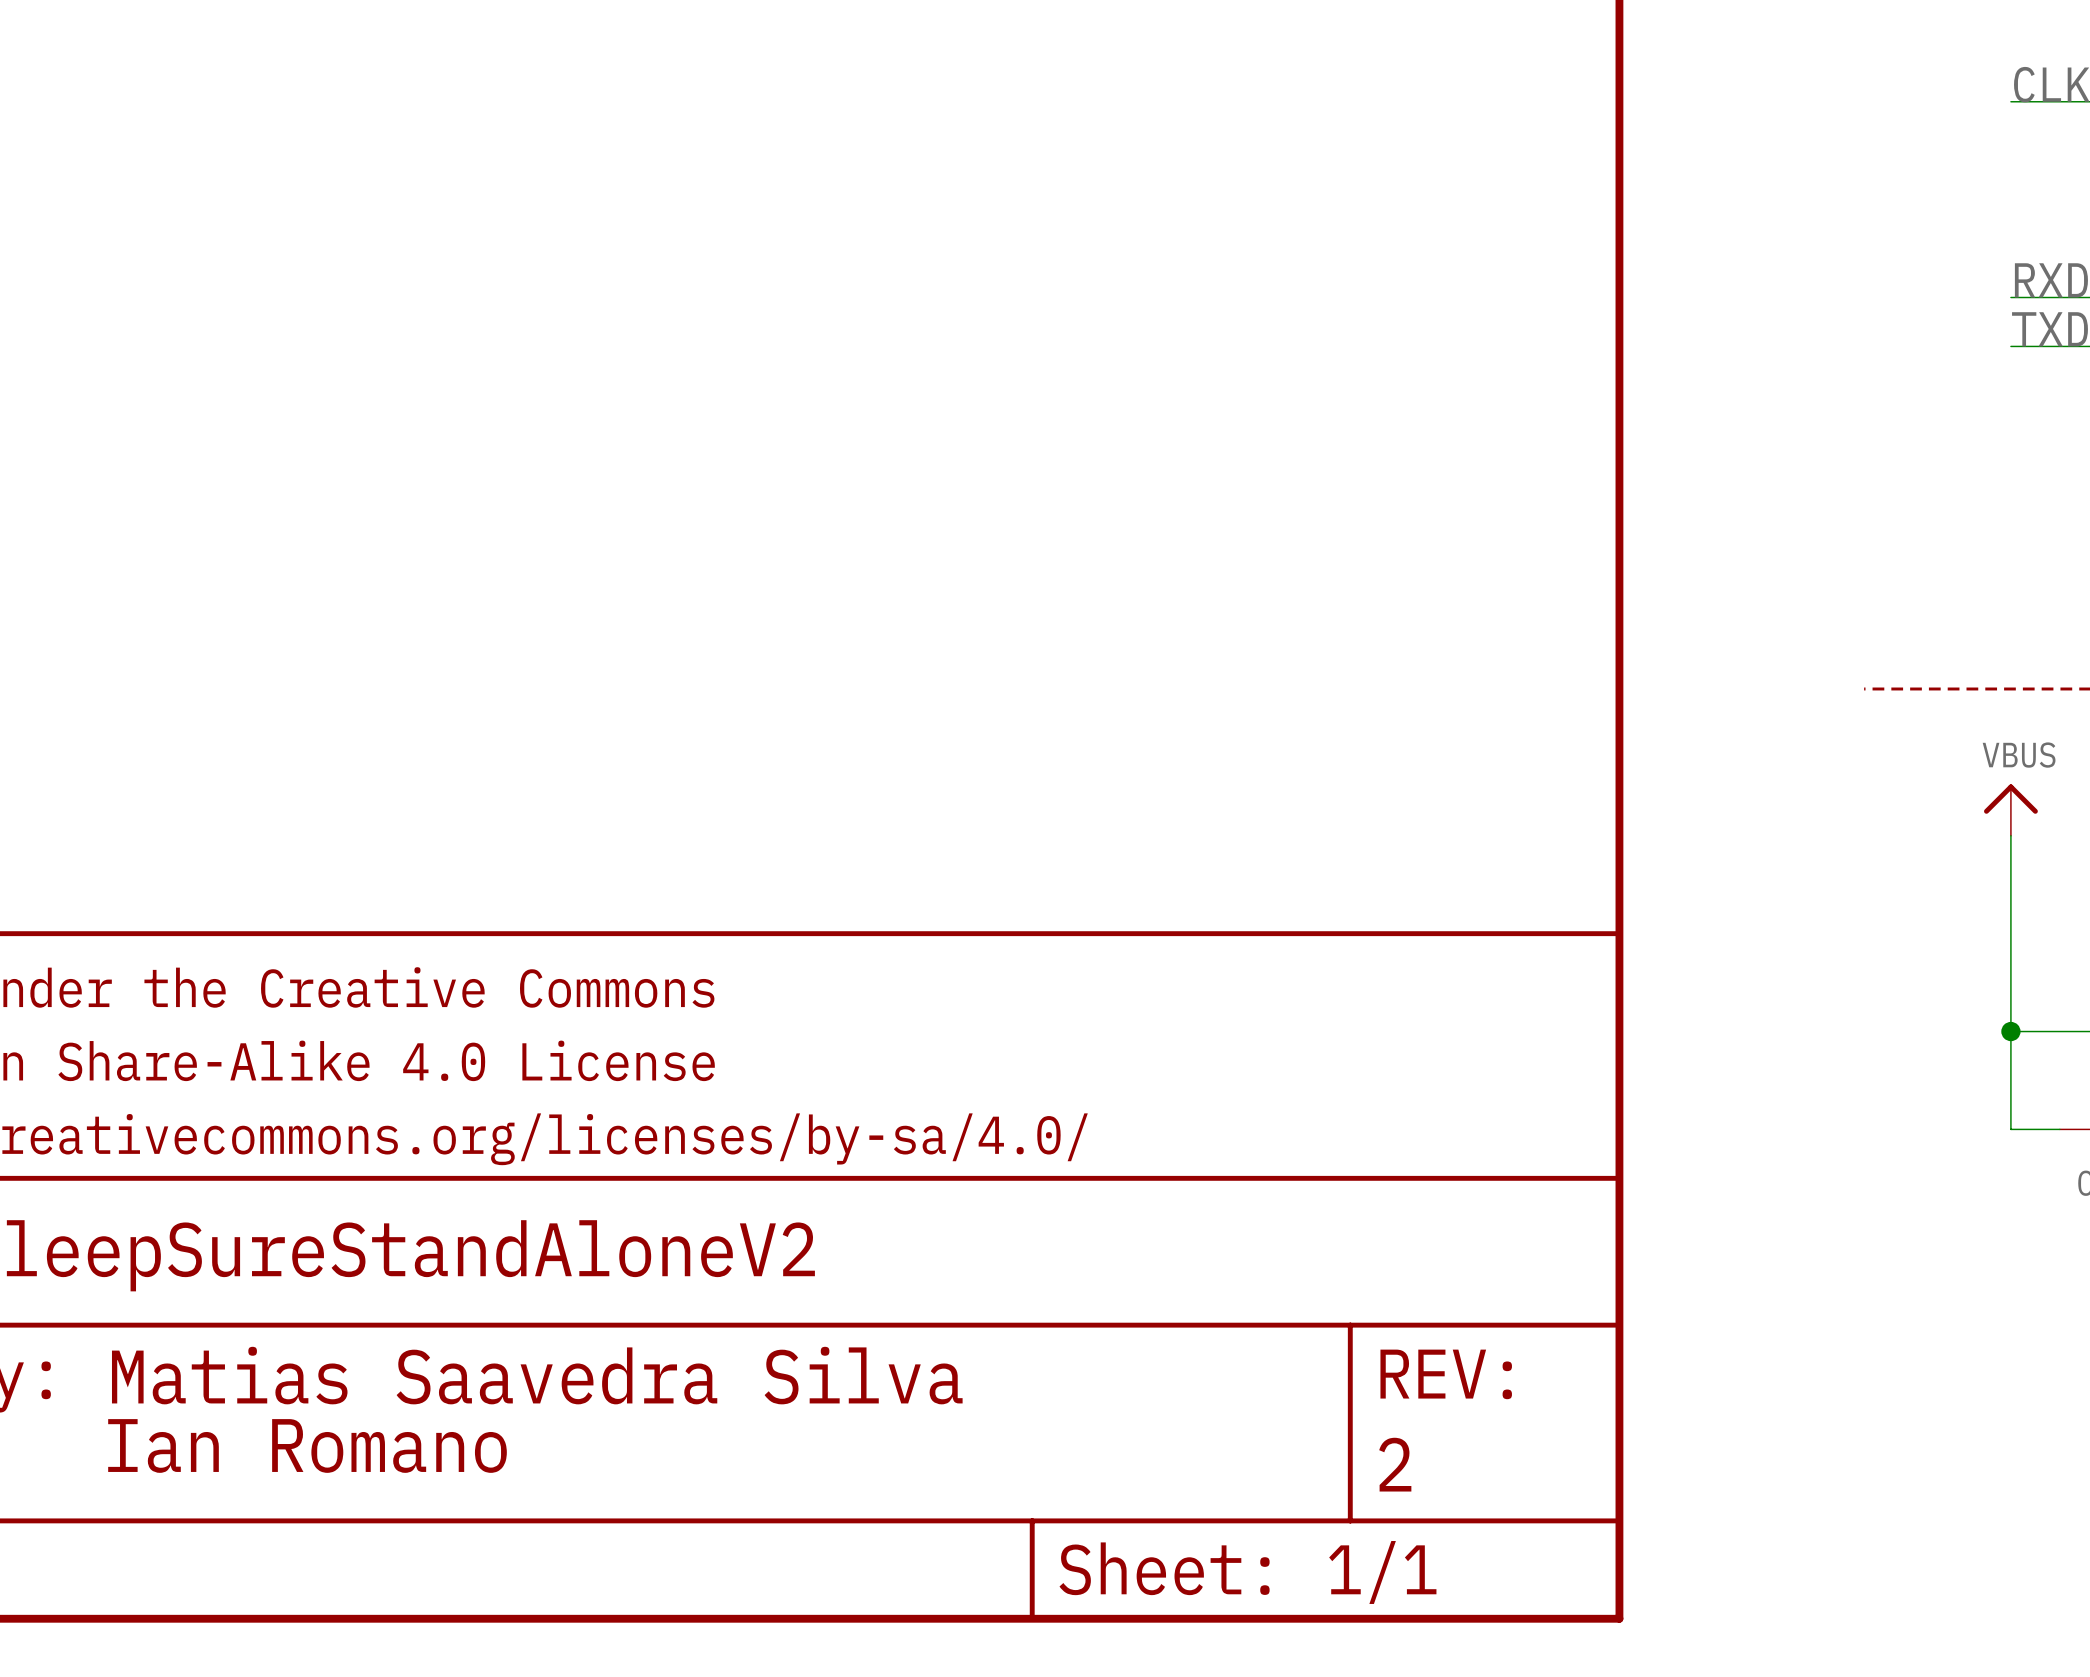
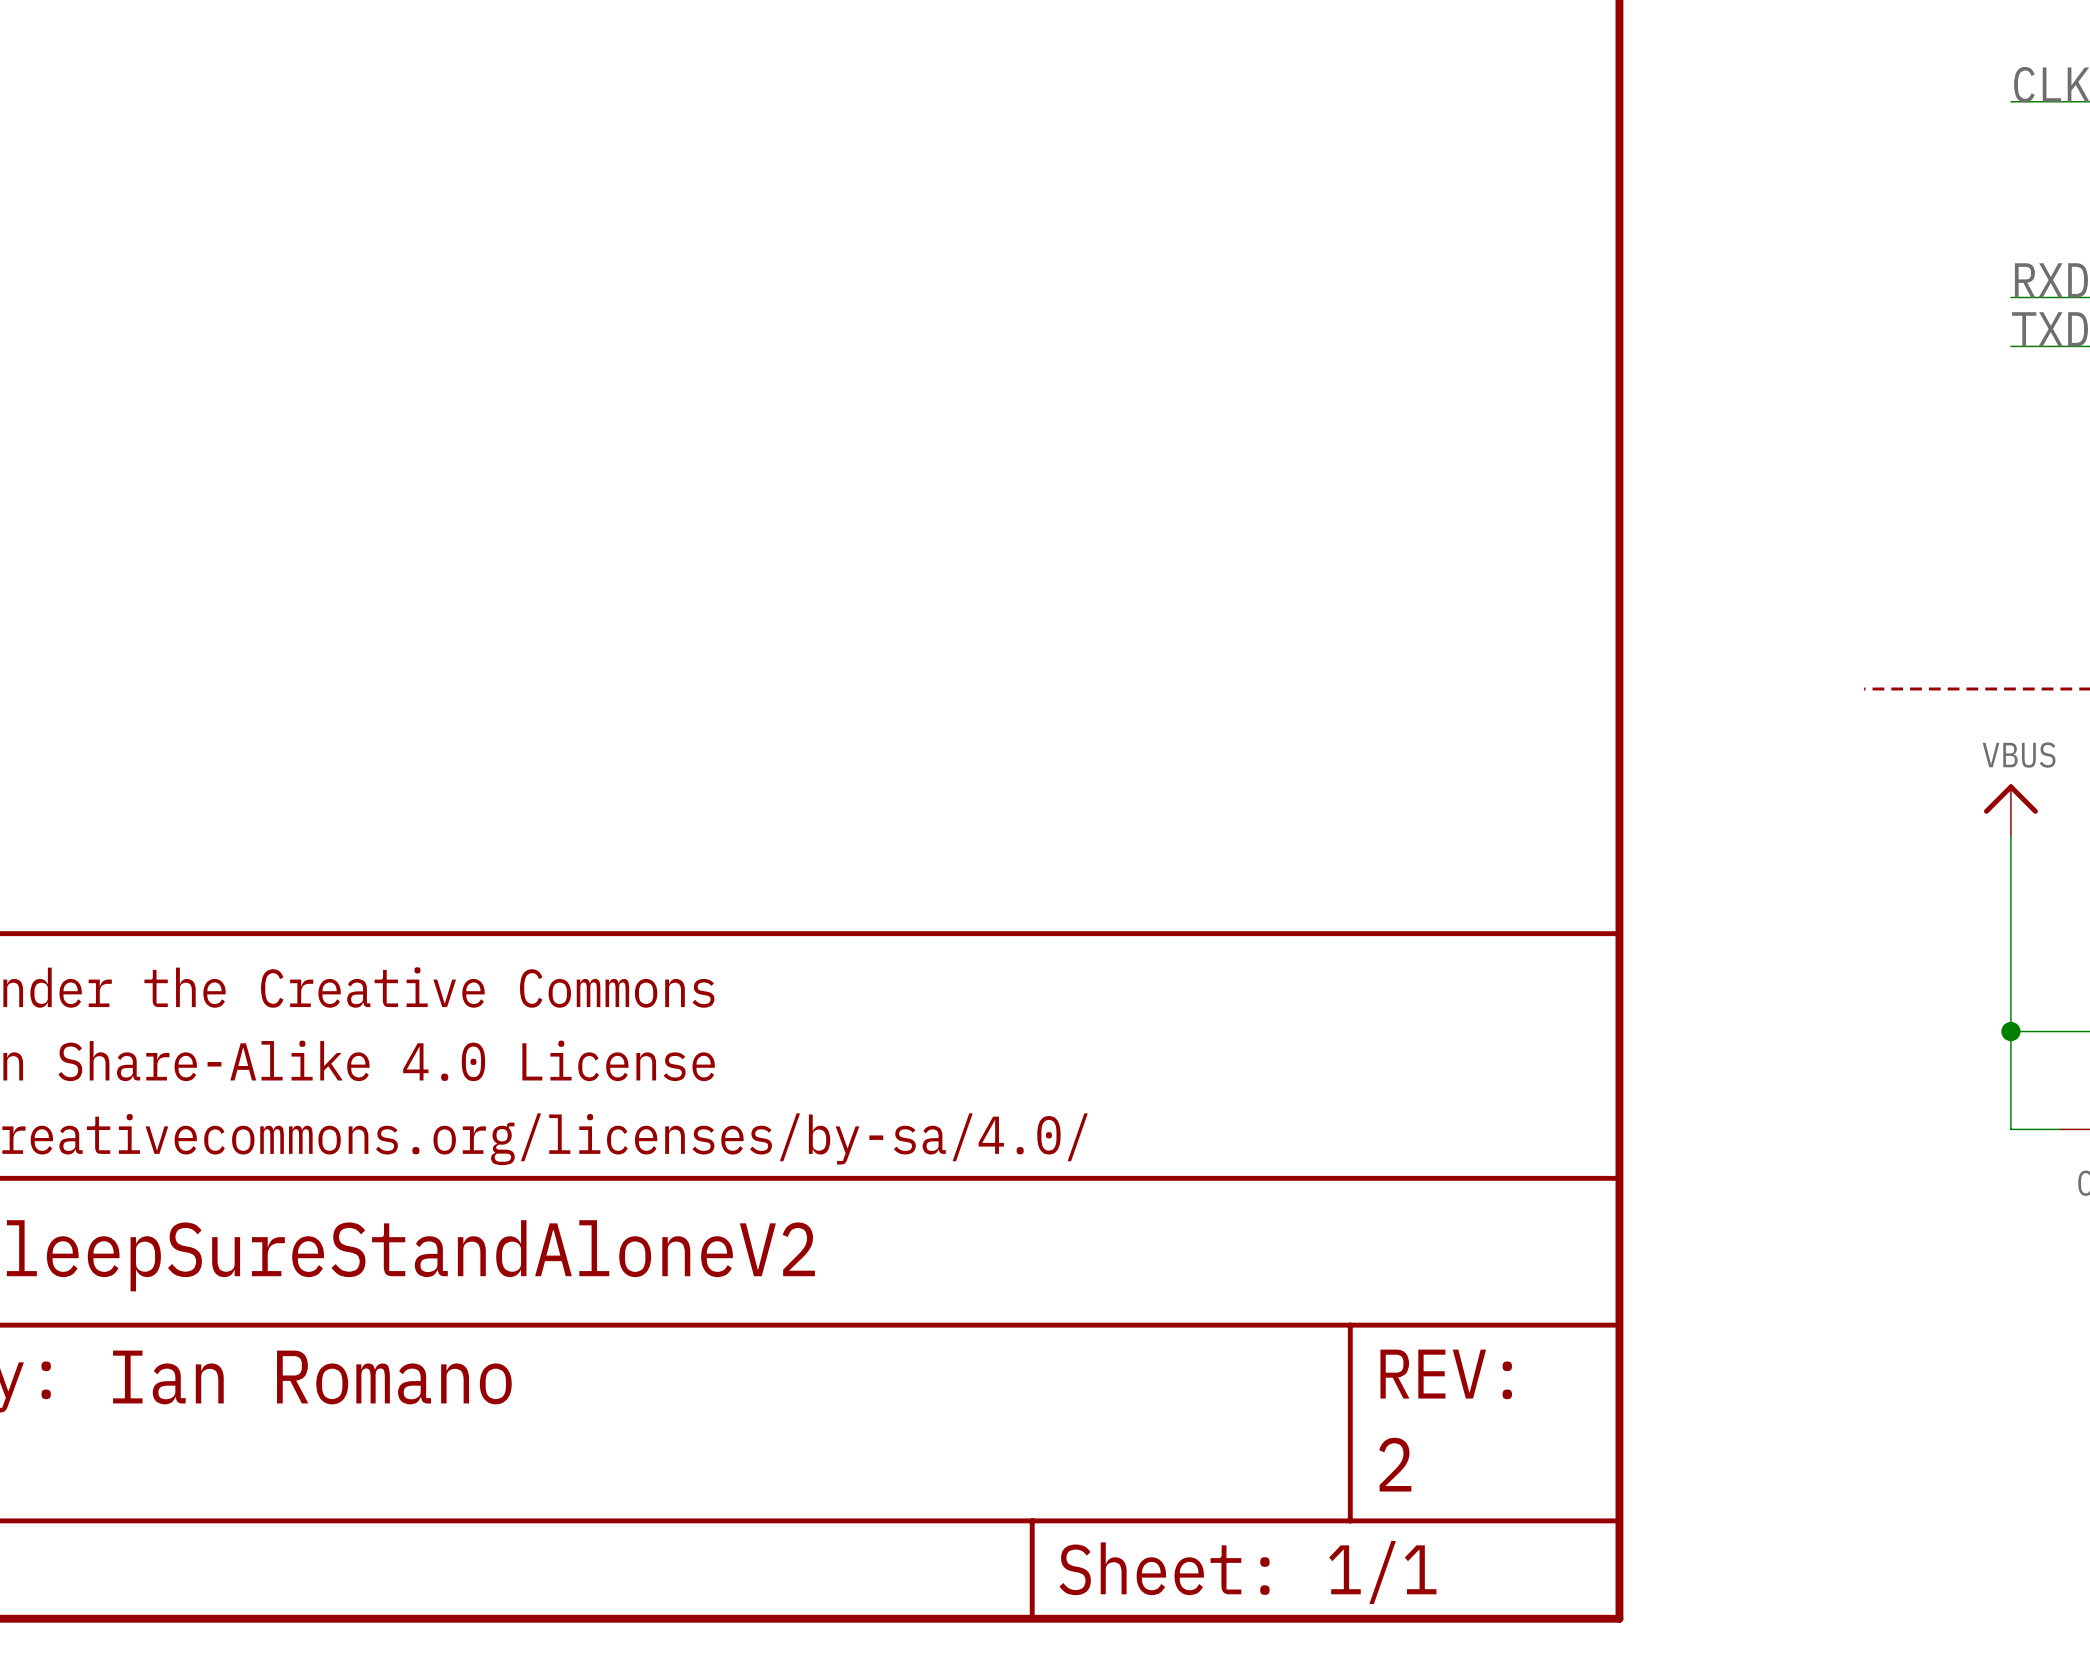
part text: Matias Saavedra Silva (537, 1375) -> Ian Romano (312, 1377)
part text: Ian Romano (307, 1445) -> none

